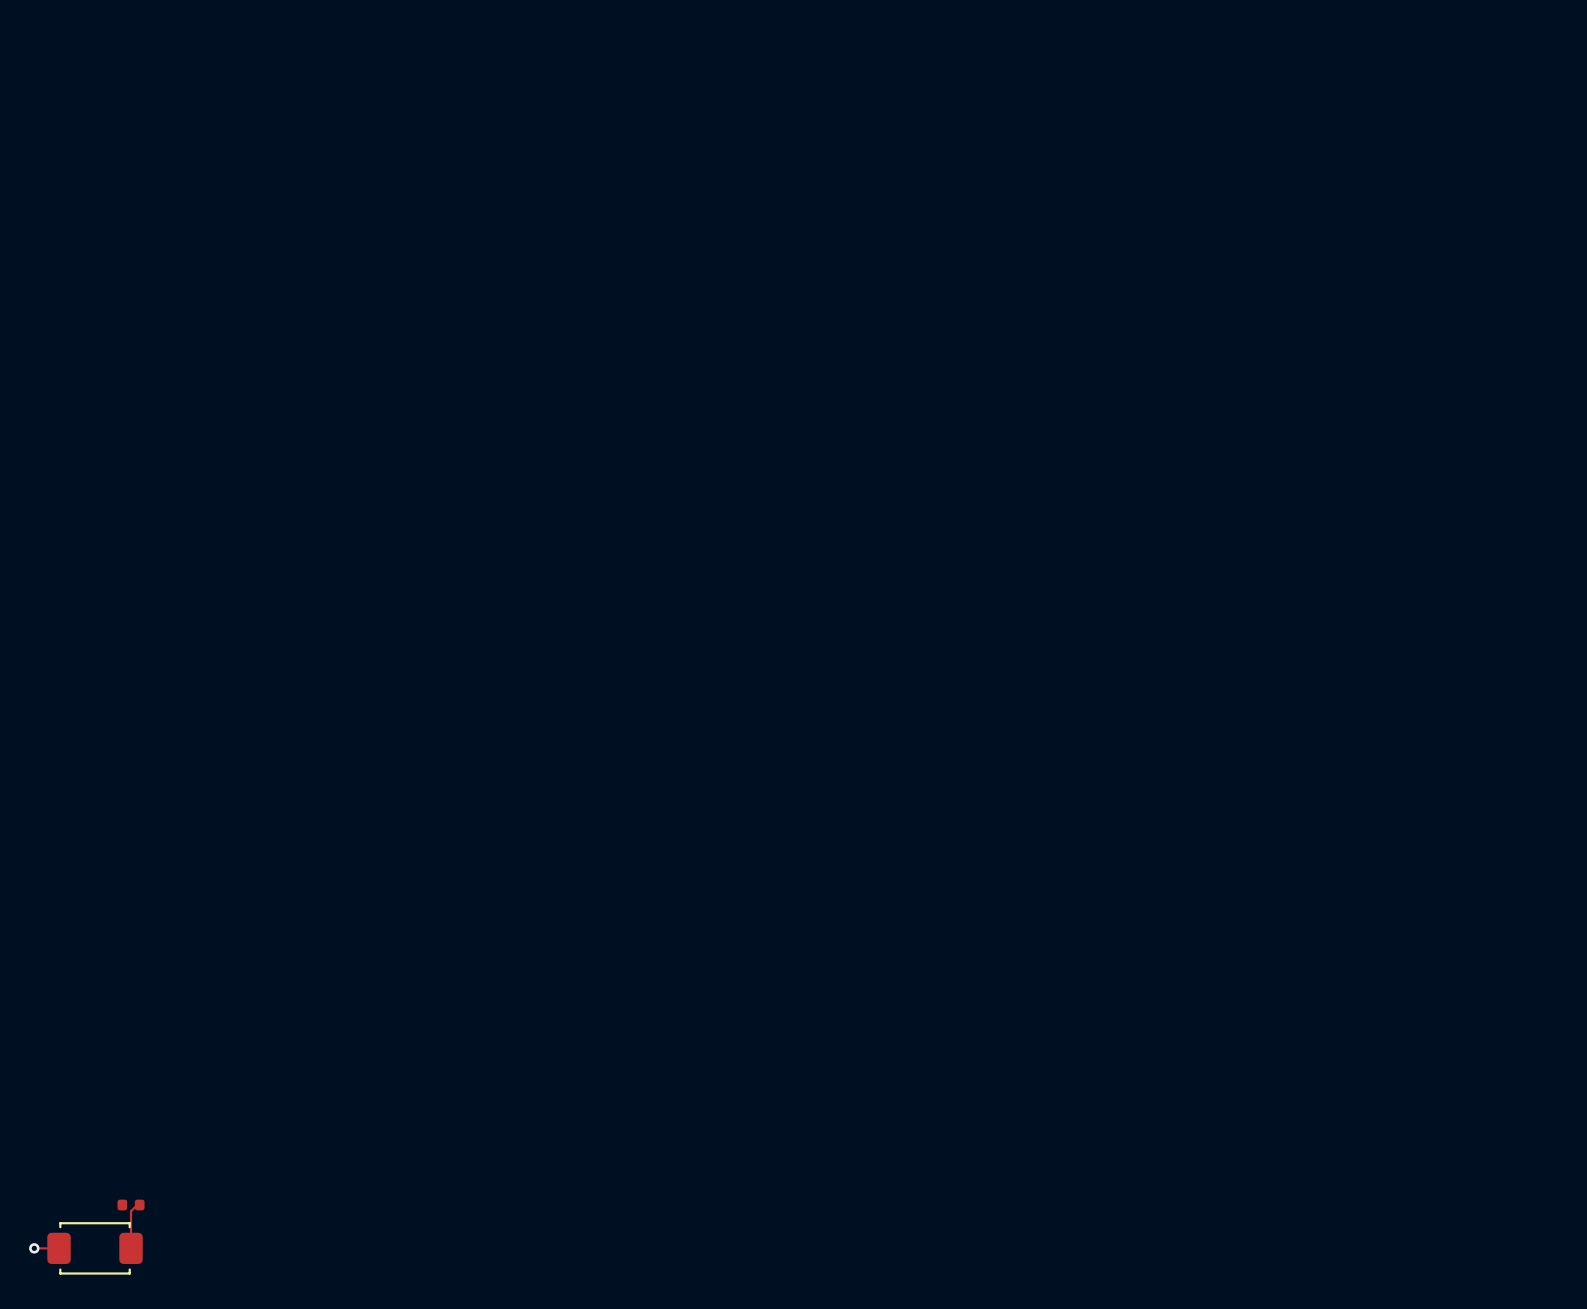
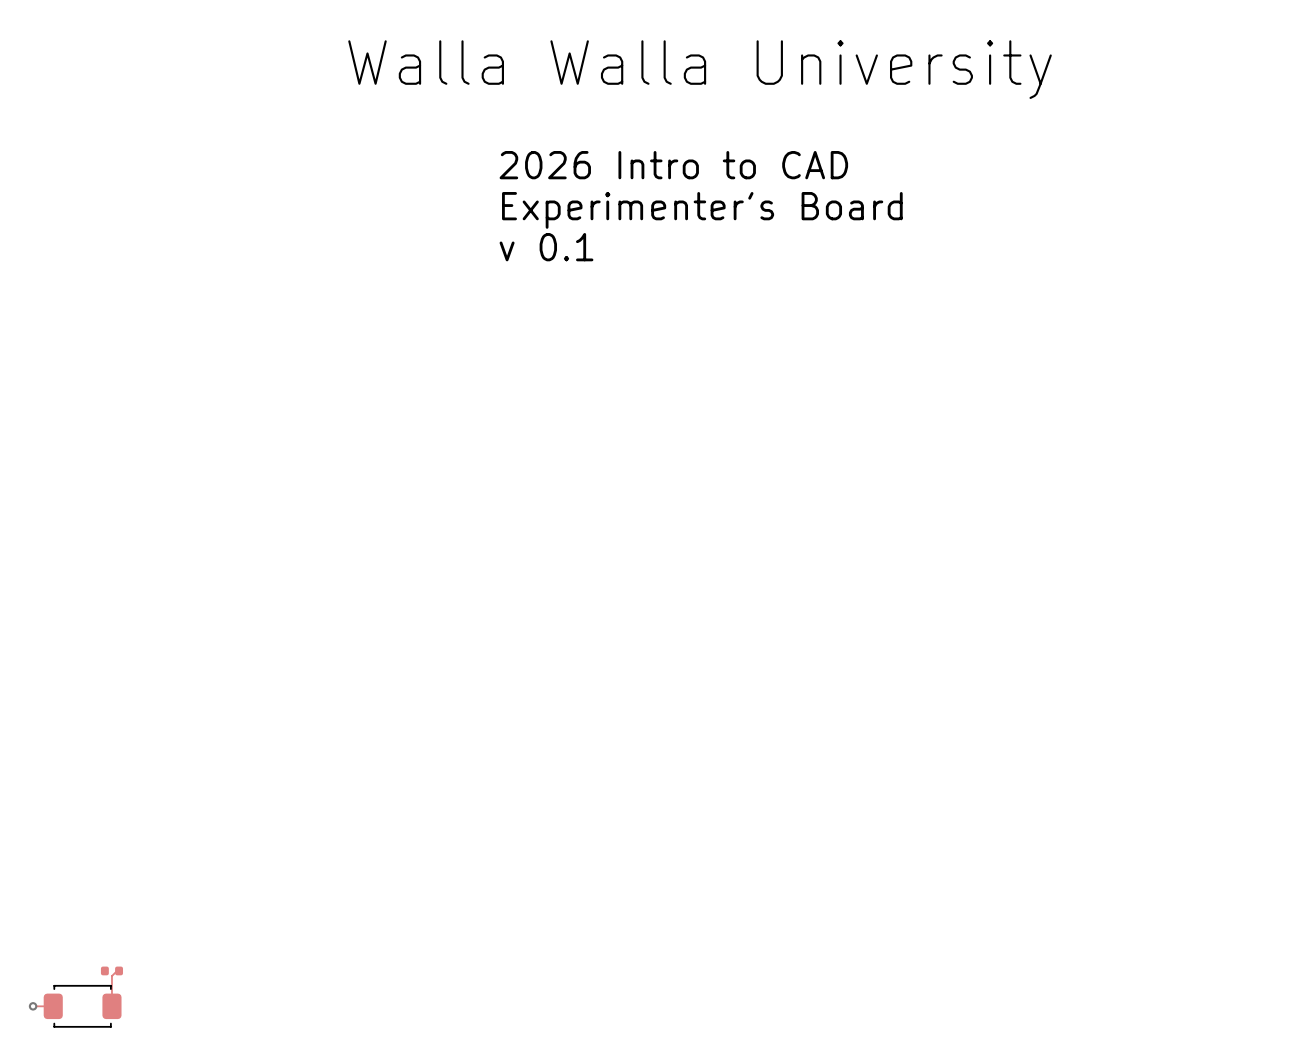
text: none -> Walla Walla University (700, 69)
text: none -> 2026 Intro to CAD (673, 165)
text: none -> Experimenter's Board (702, 210)
text: none -> v 0.1 (546, 247)

